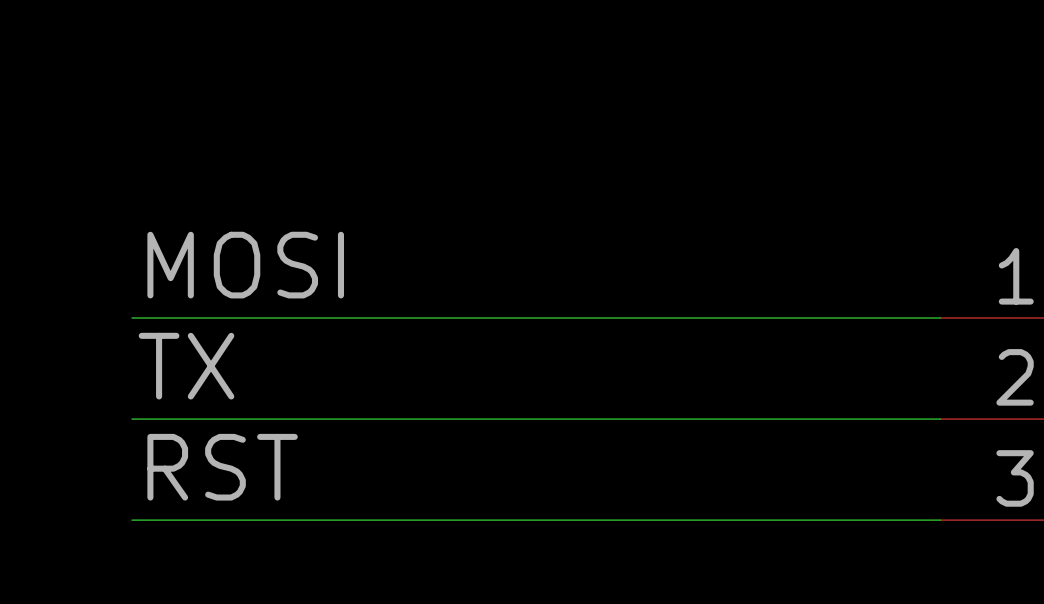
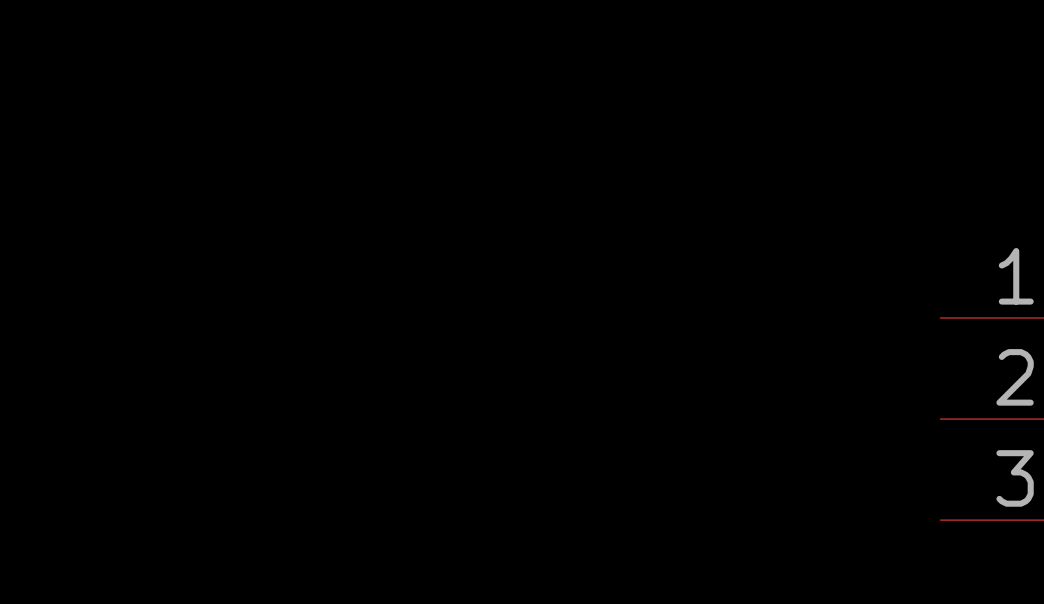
label: MOSI (245, 265) -> none
wire: (131, 318) (940, 318) -> none
label: TX (186, 366) -> none
wire: (131, 419) (940, 419) -> none
label: RST (222, 467) -> none
wire: (131, 520) (940, 520) -> none

